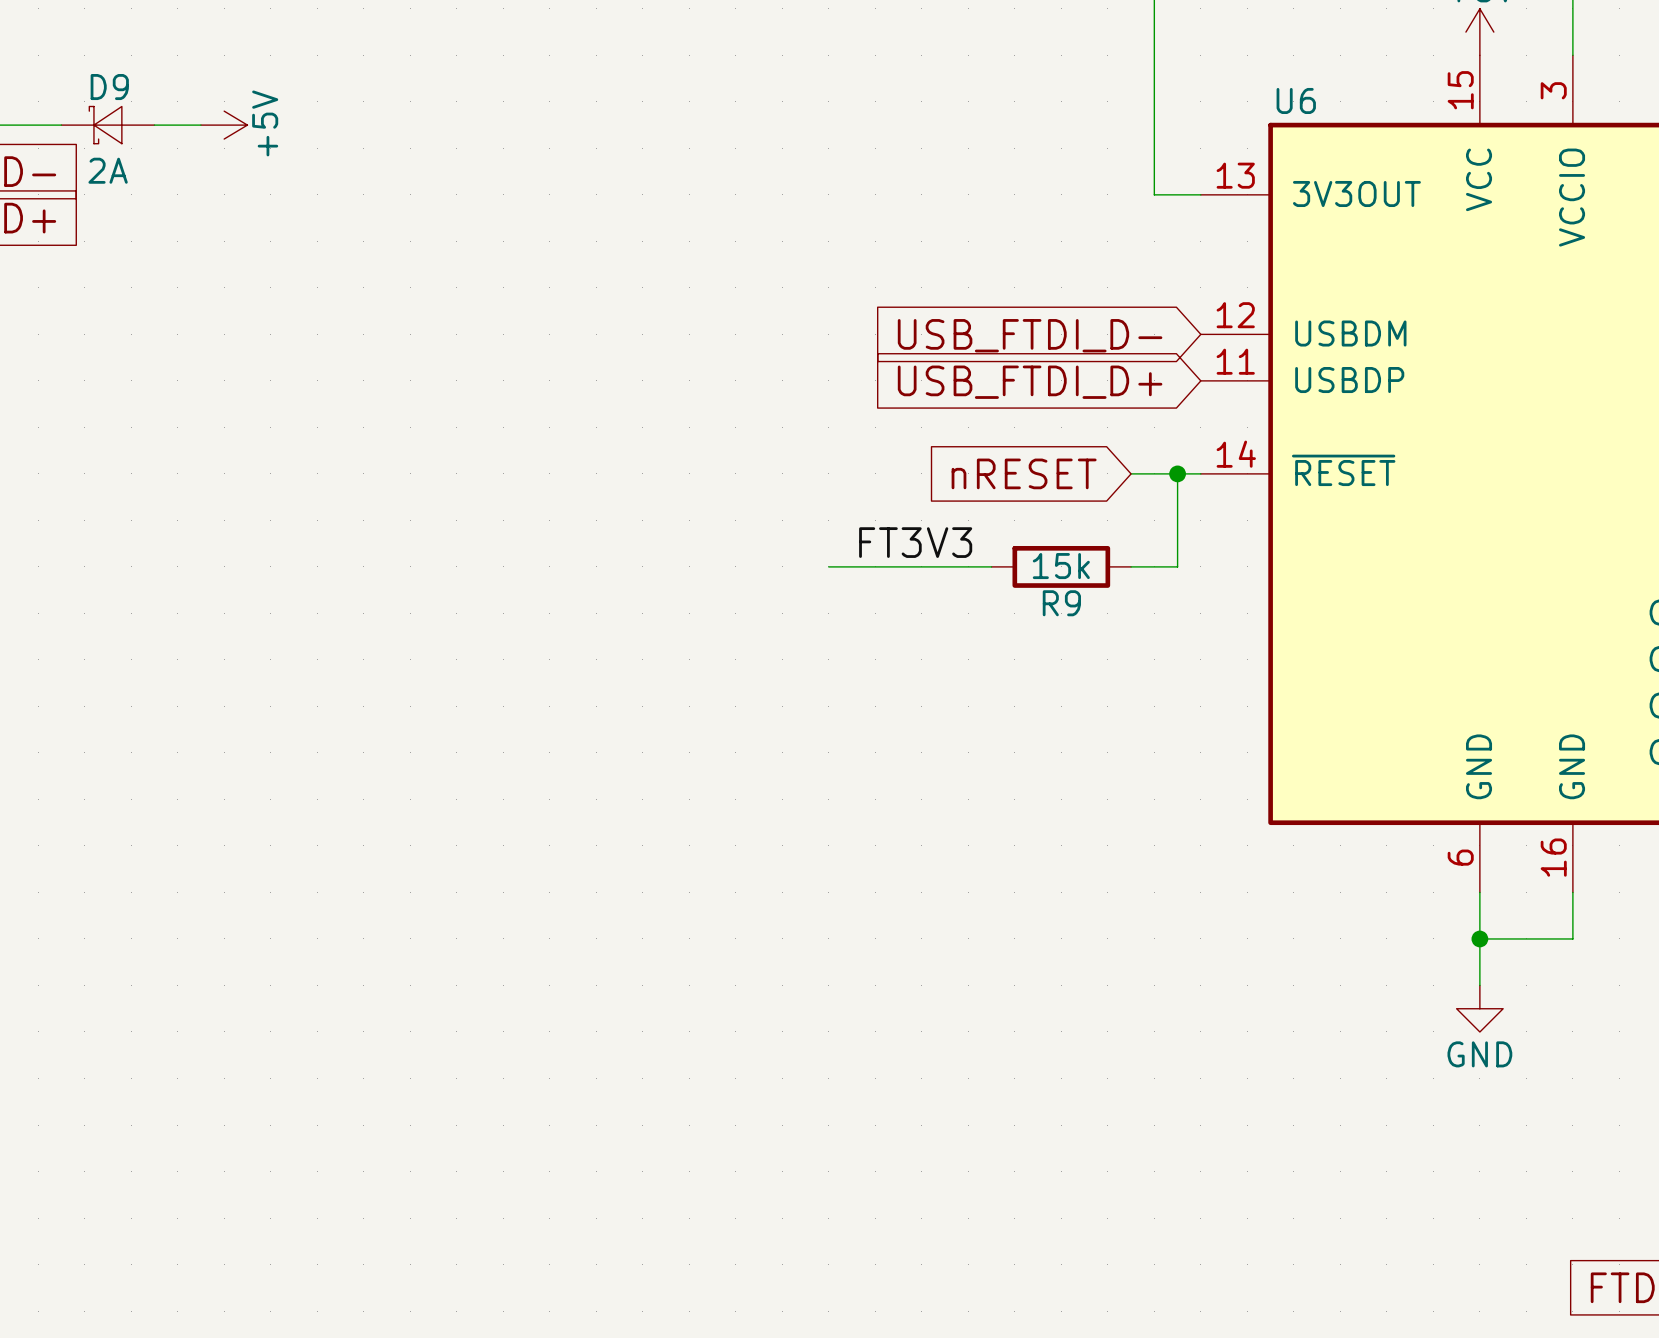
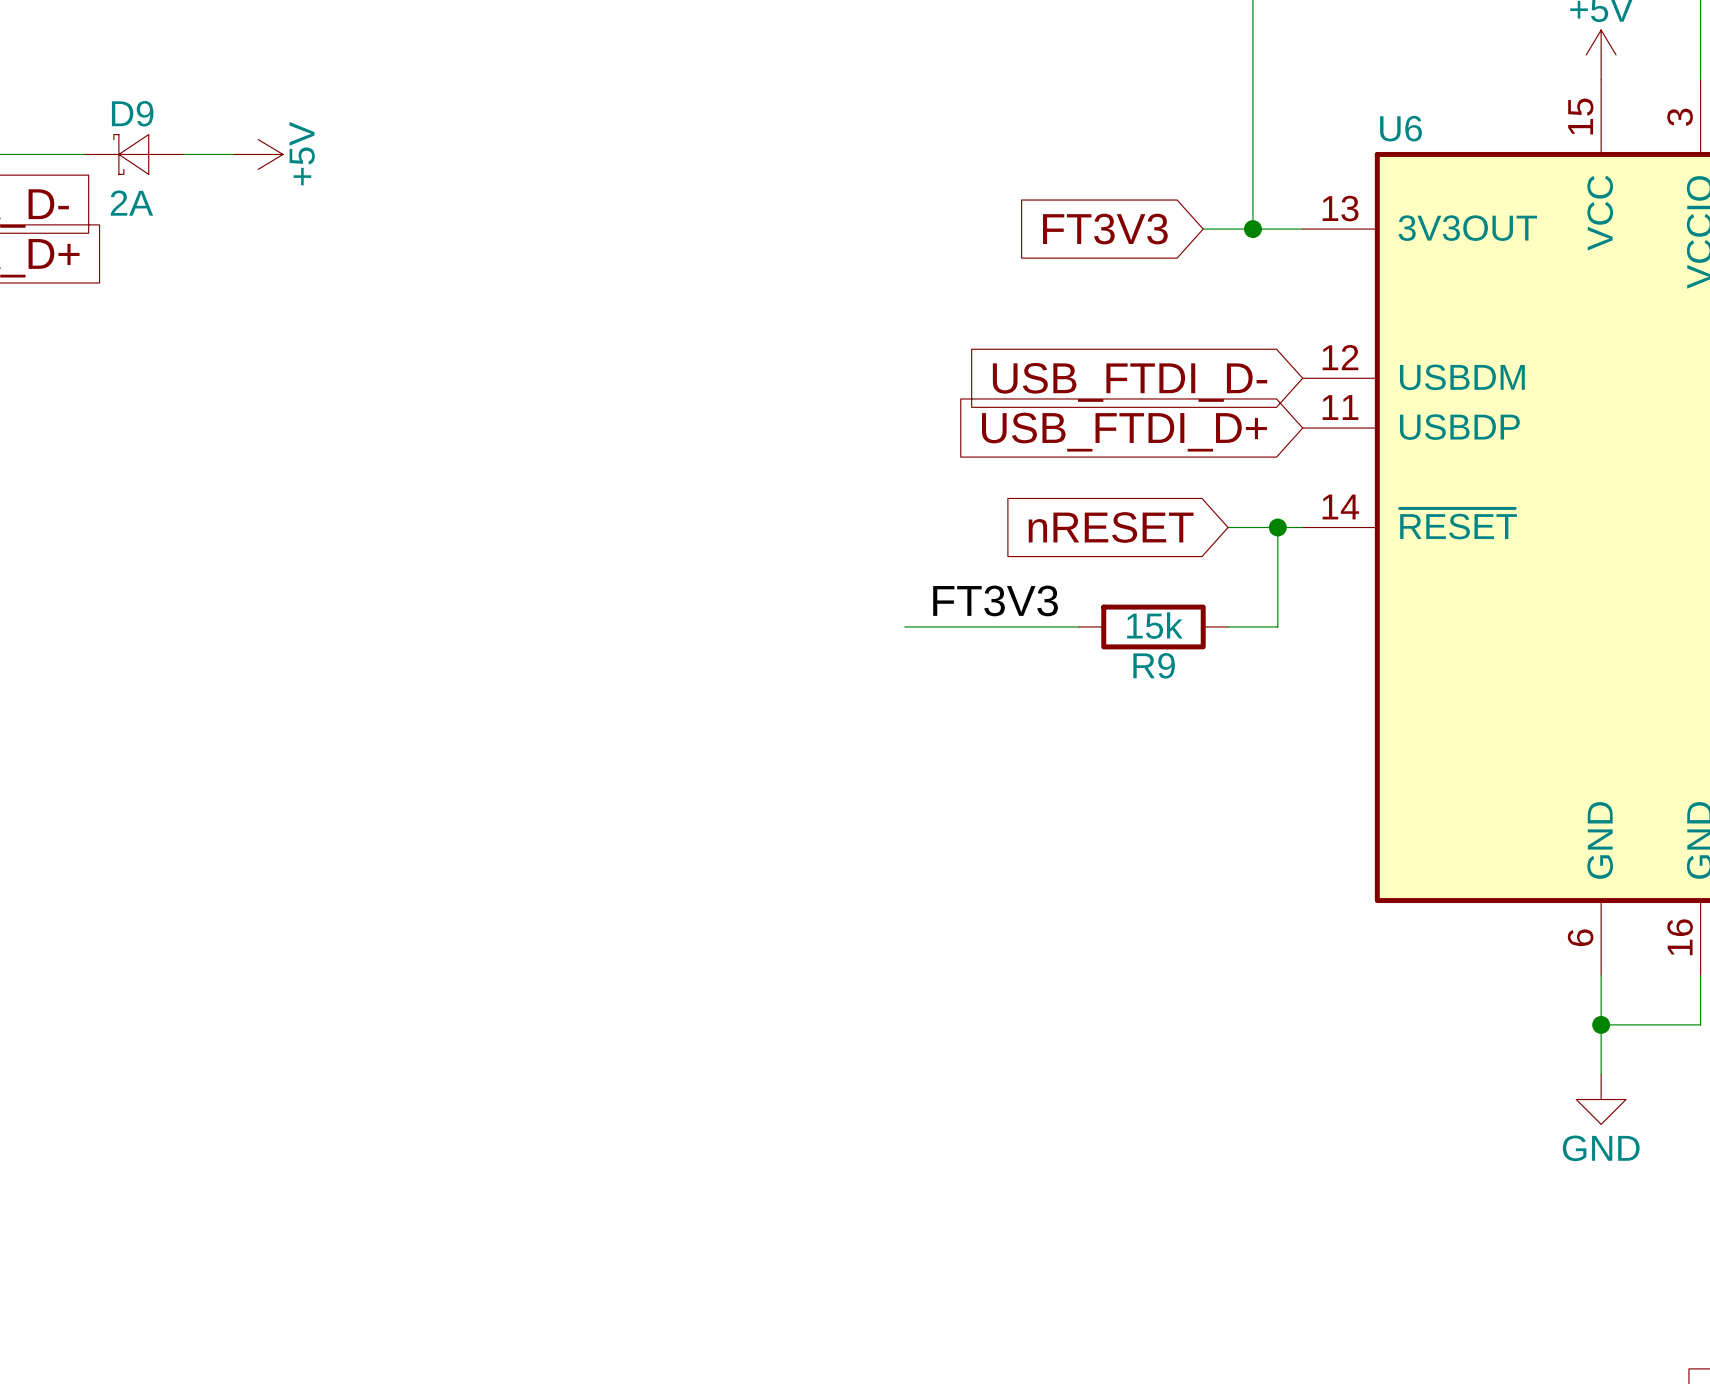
global label: none -> FT3V3 (1105, 229)
wire: none -> (1203, 229) (1252, 229)
junction: none -> (1252, 229)

